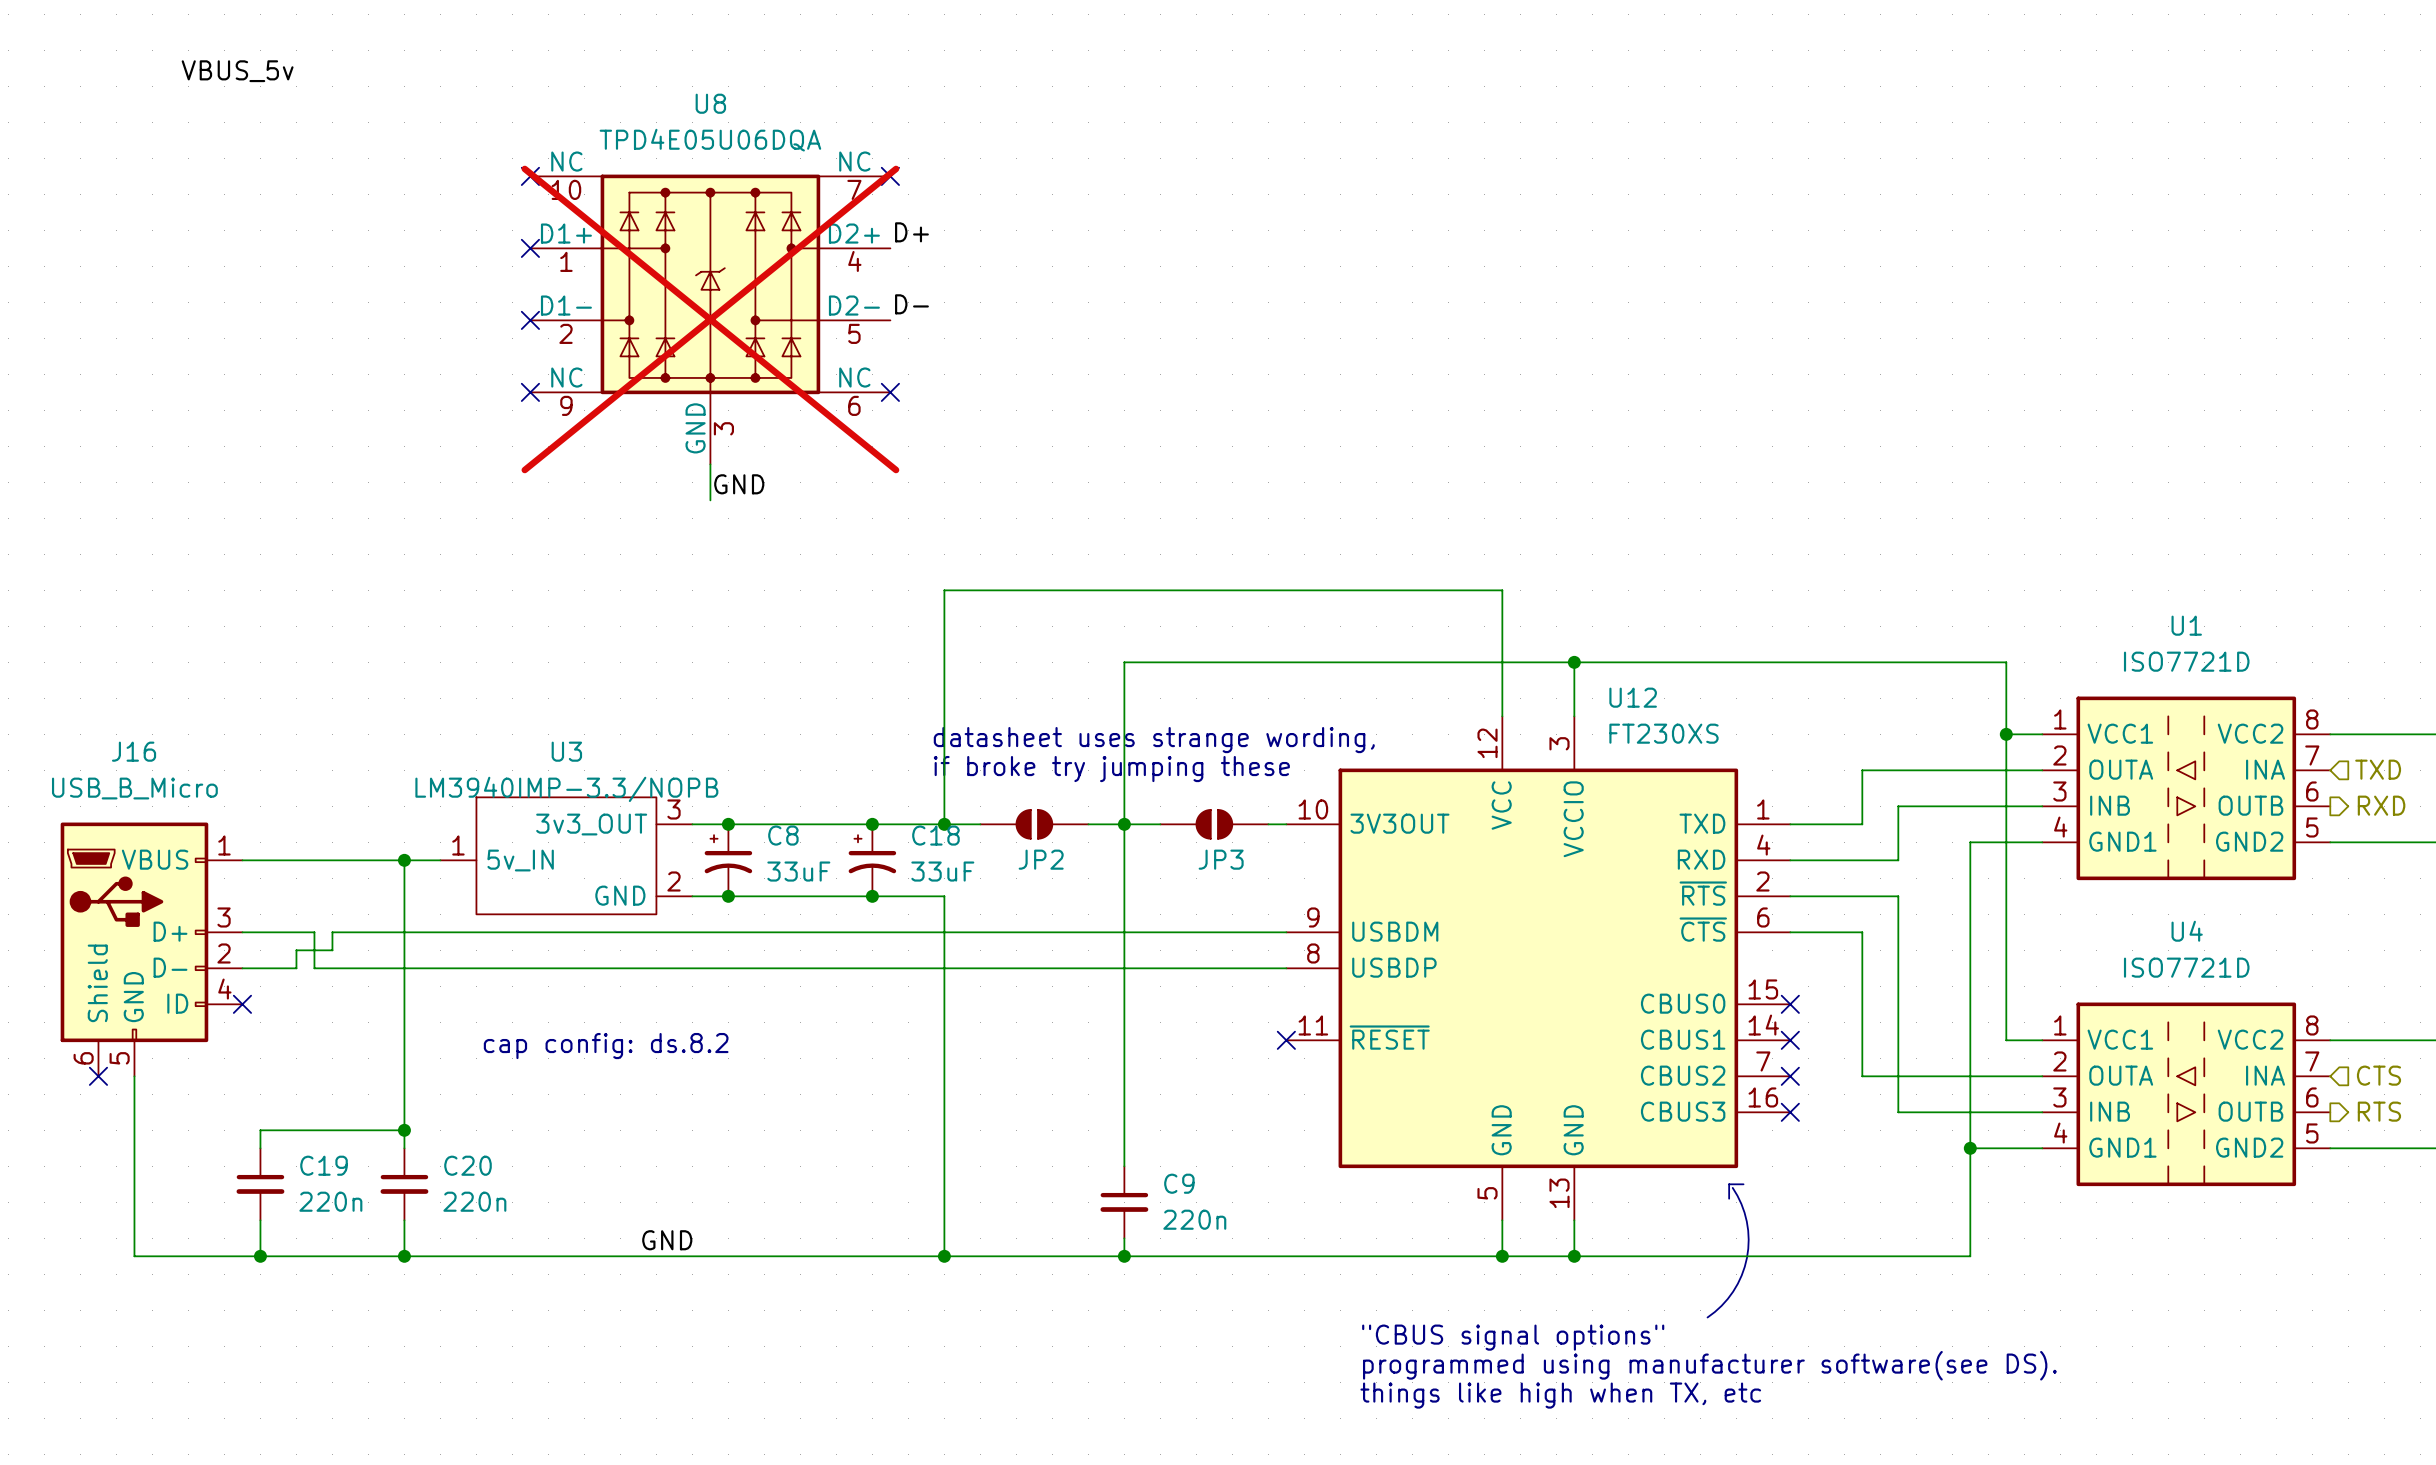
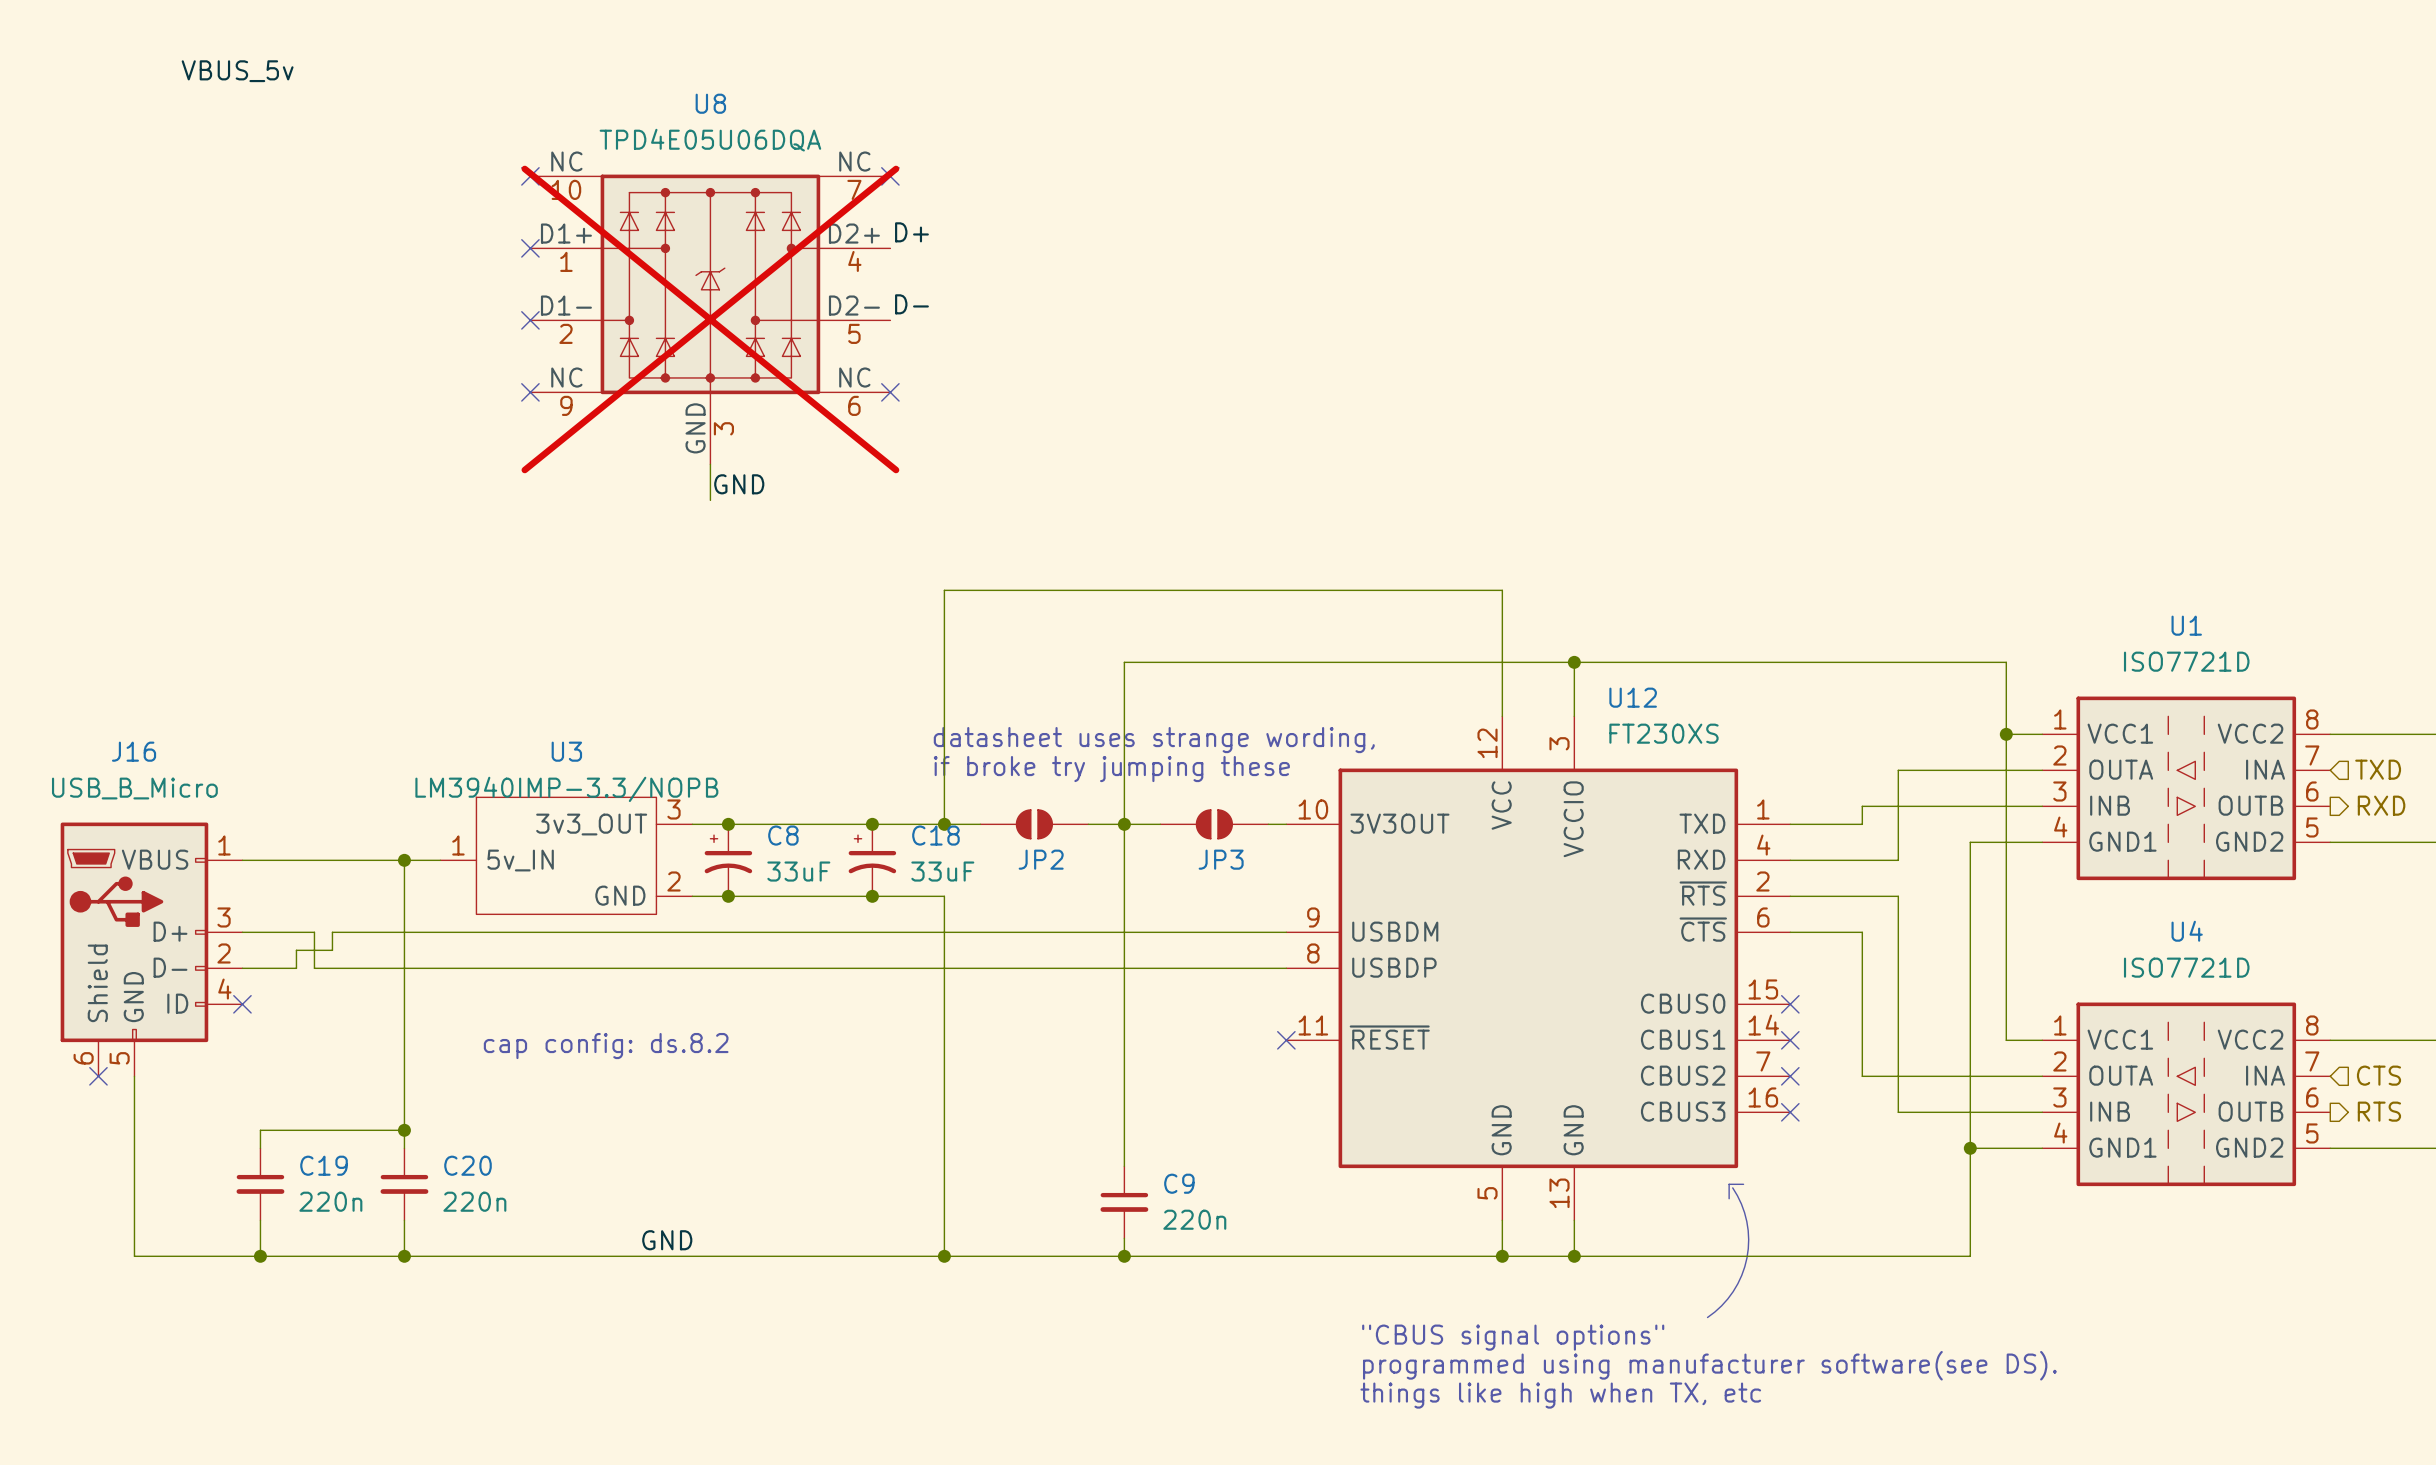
wire: (1898, 770) (1862, 770) (1862, 806) -> (1898, 770) (1898, 806) (1862, 806)

